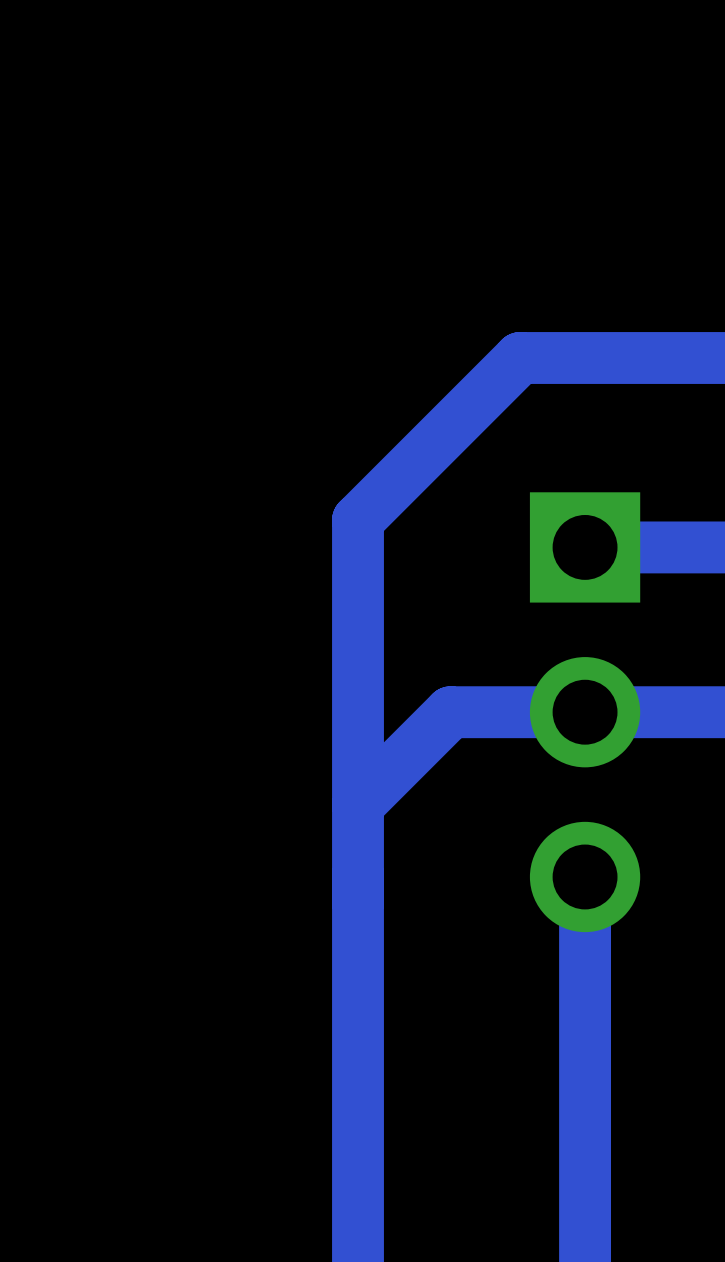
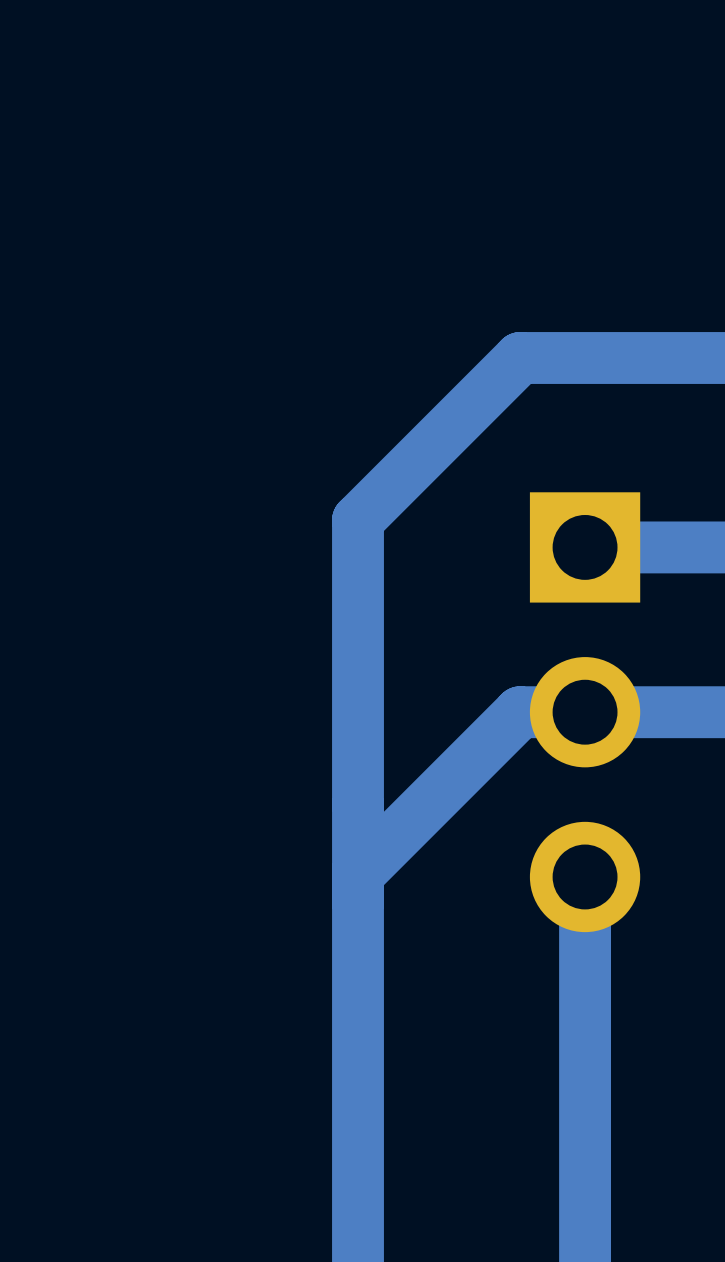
bottom track: (520, 712) (450, 712) (358, 804) -> (520, 712) (358, 874)

